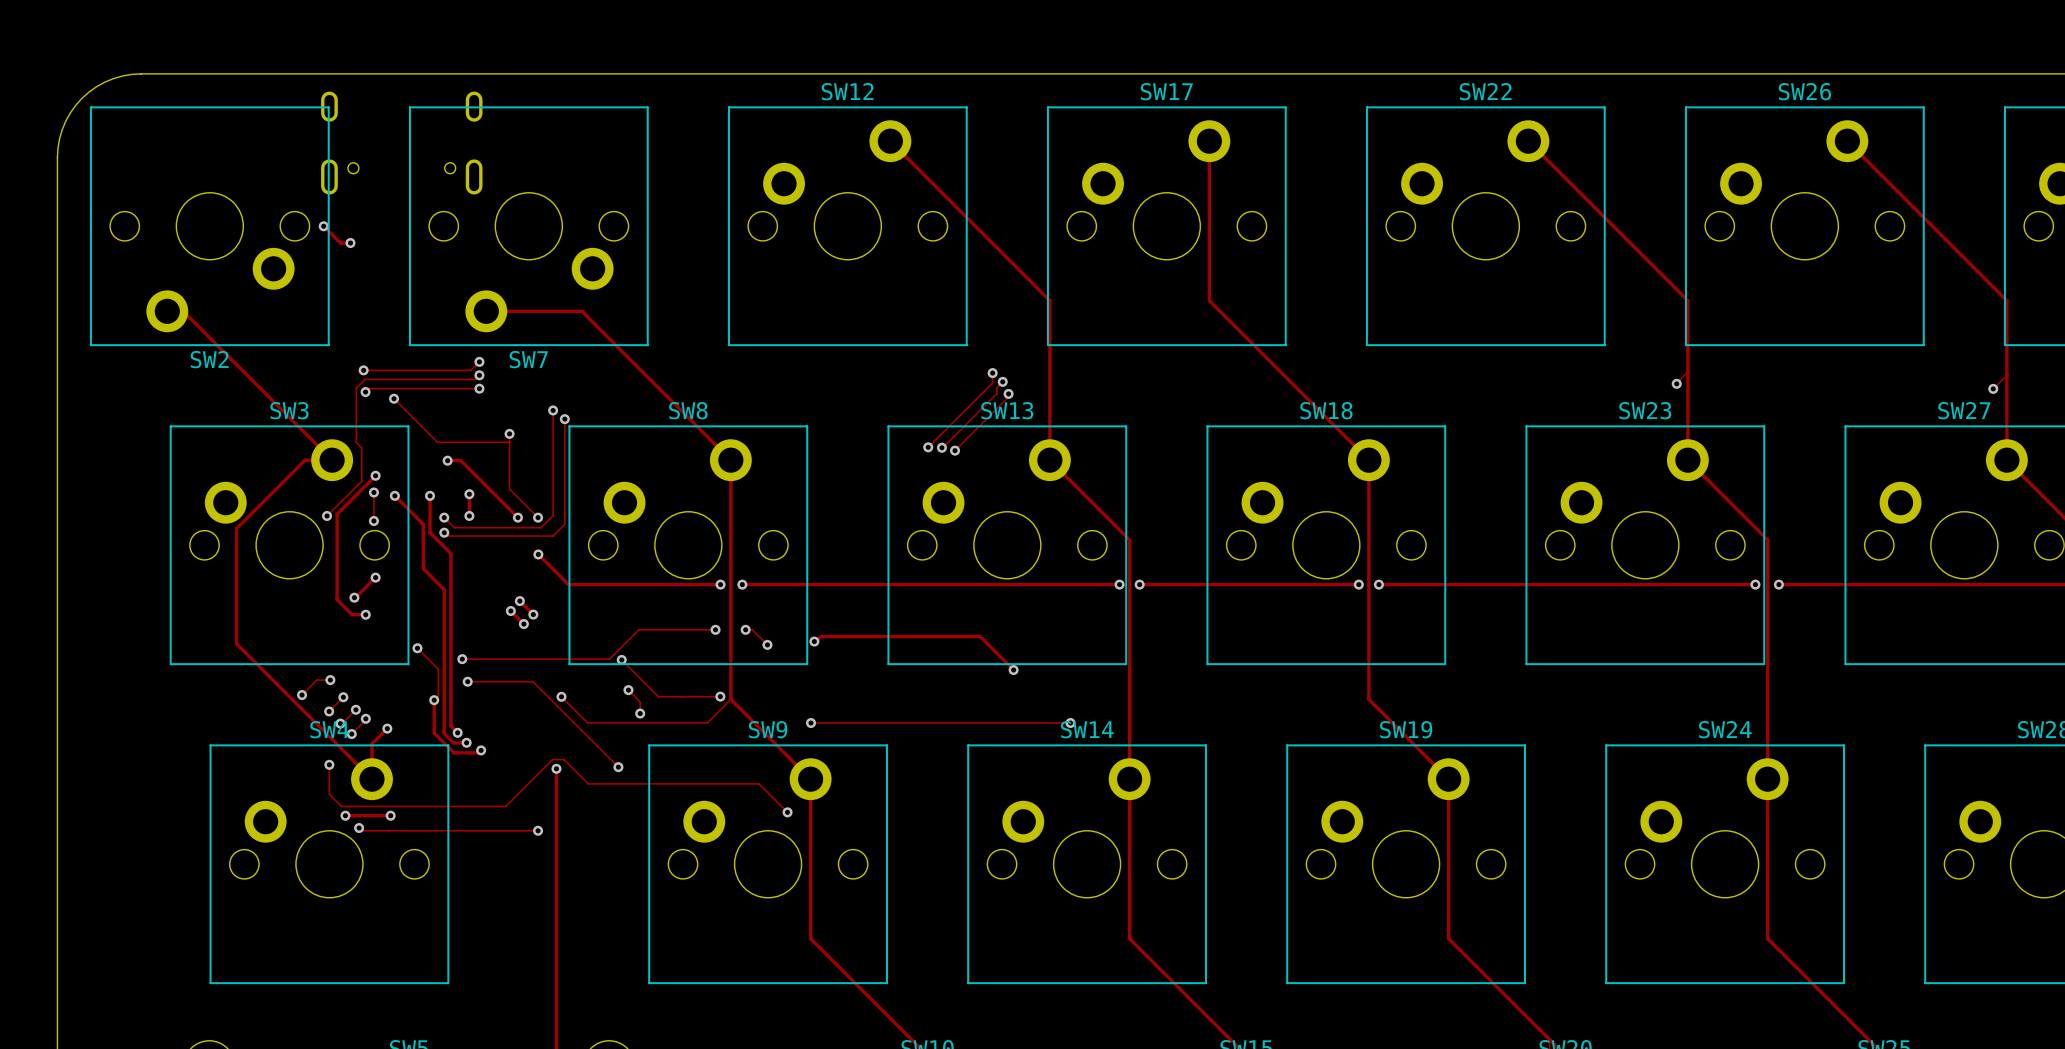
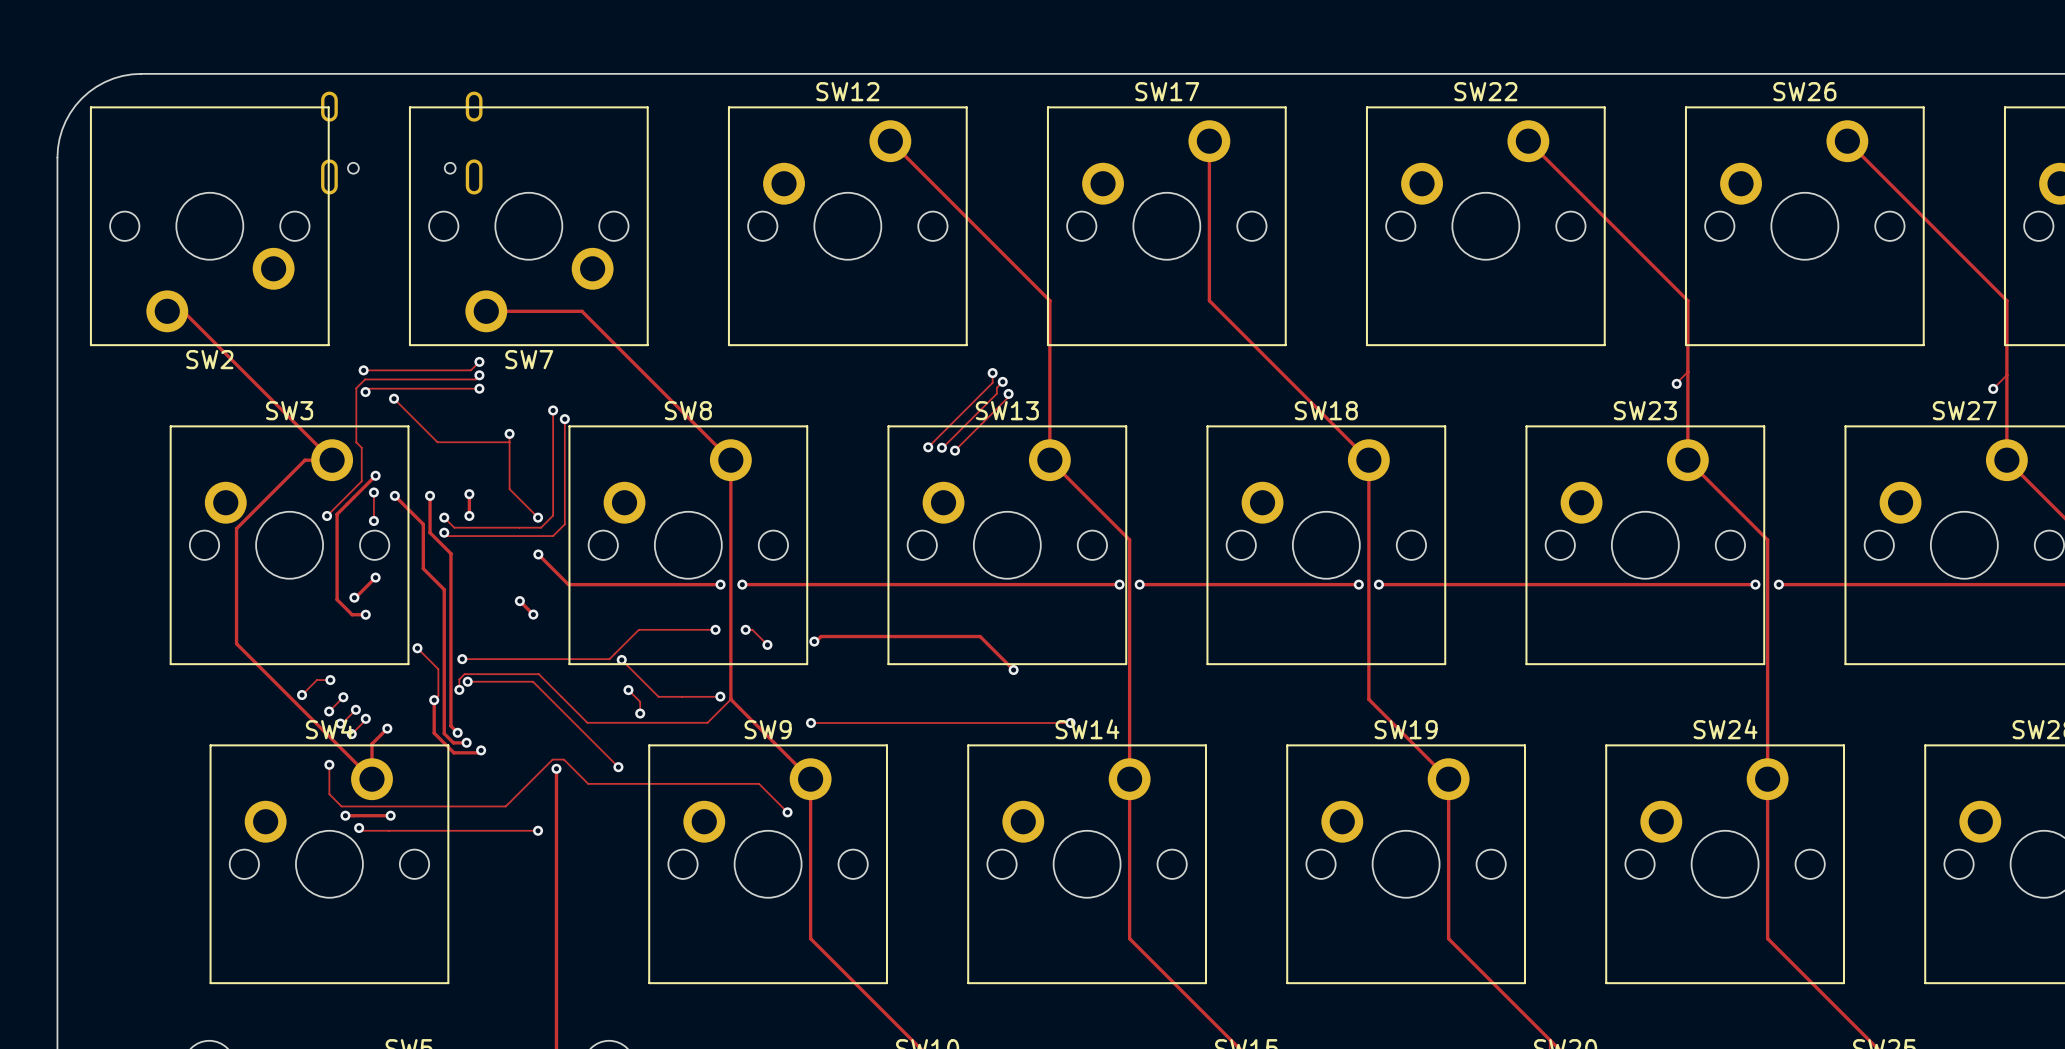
track: (323, 226) (340, 243) (350, 243) -> none
via: (323, 226) -> none
via: (350, 243) -> none
track: (447, 460) (461, 460) (517, 517) -> none
via: (447, 460) -> none
via: (517, 517) -> none
track: (510, 611) (523, 624) -> none
via: (510, 611) -> none
via: (523, 624) -> none
track: none -> (459, 689) (459, 679) (464, 674) (538, 674) (561, 696)
via: none -> (459, 689)
via: (561, 696) -> none

